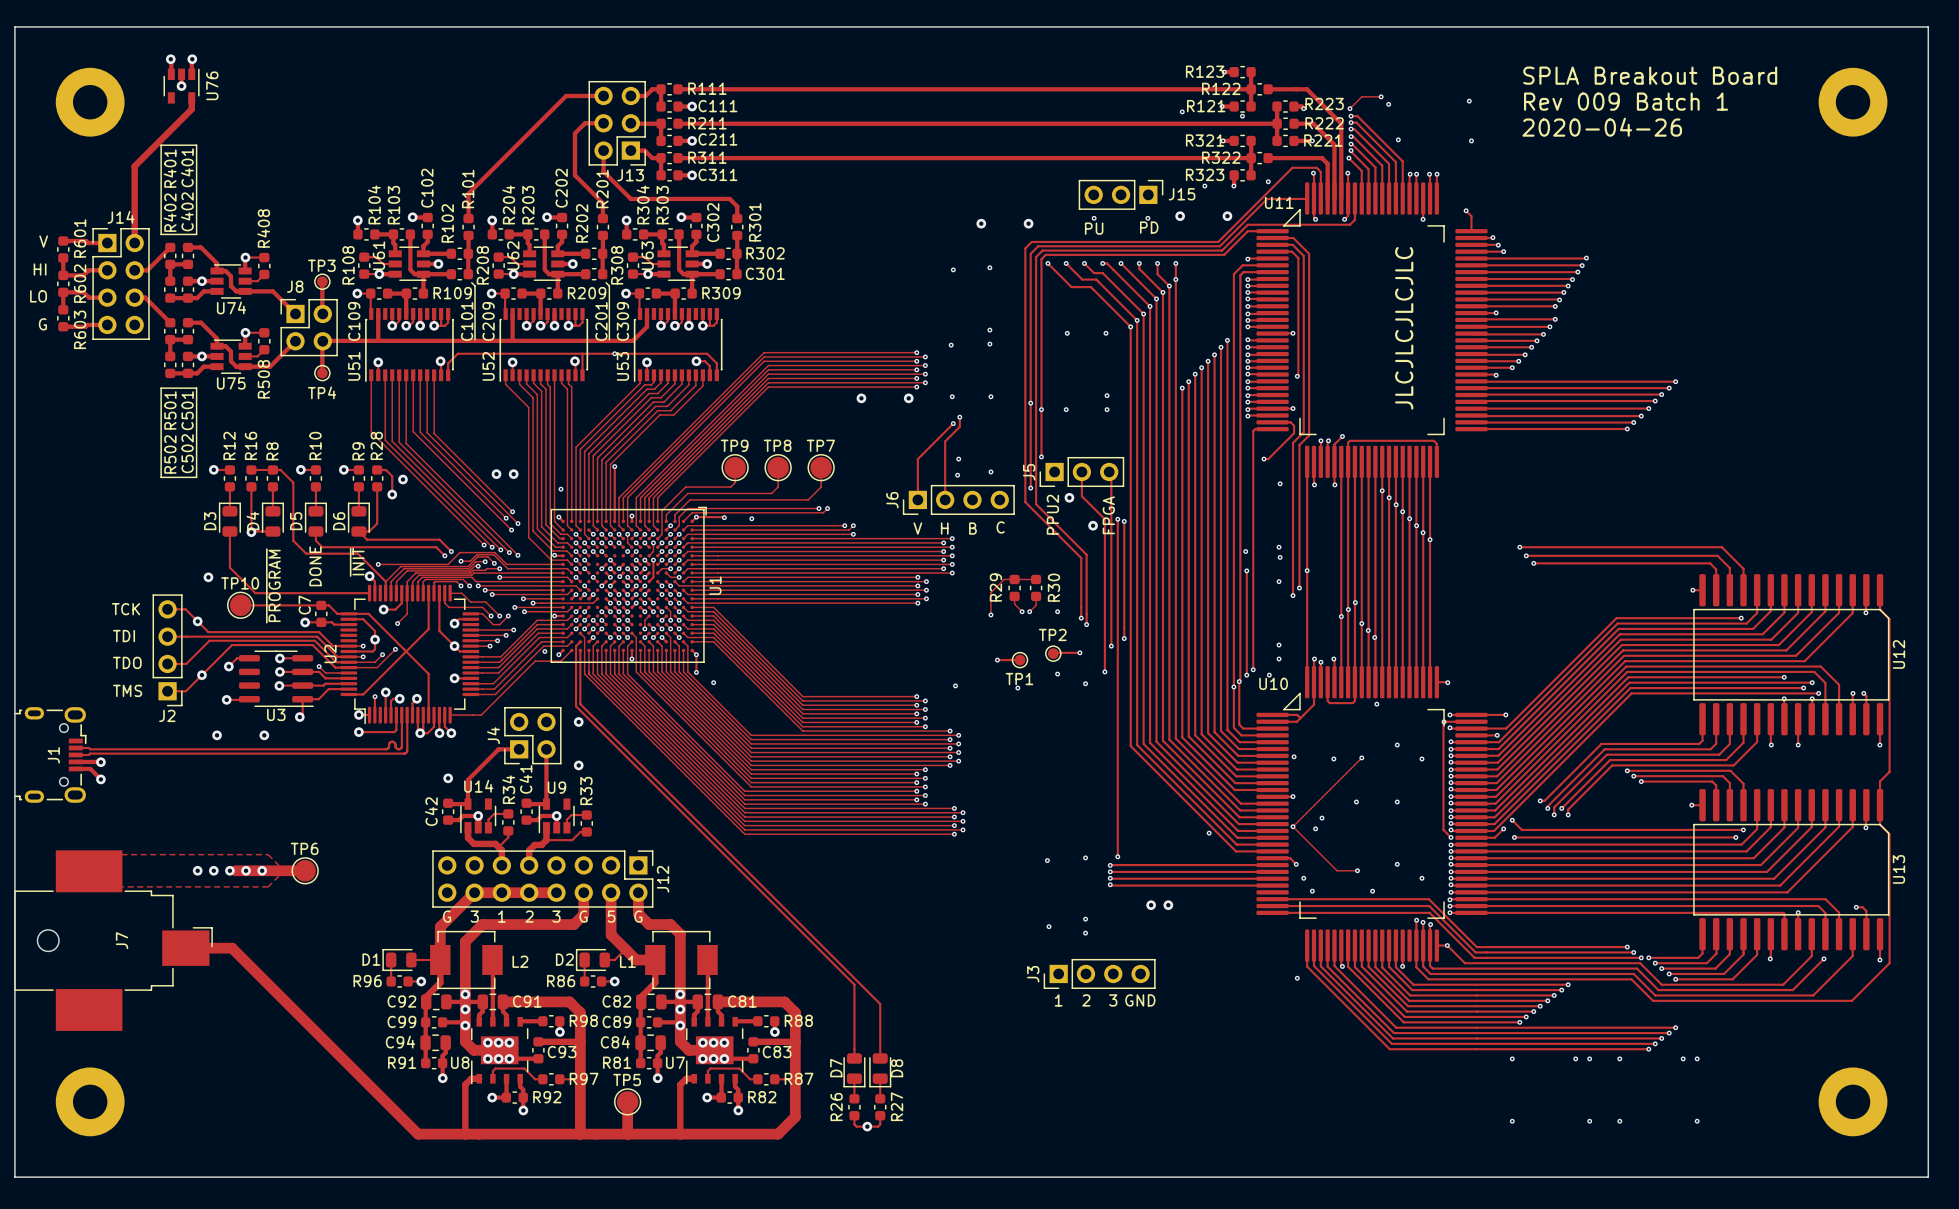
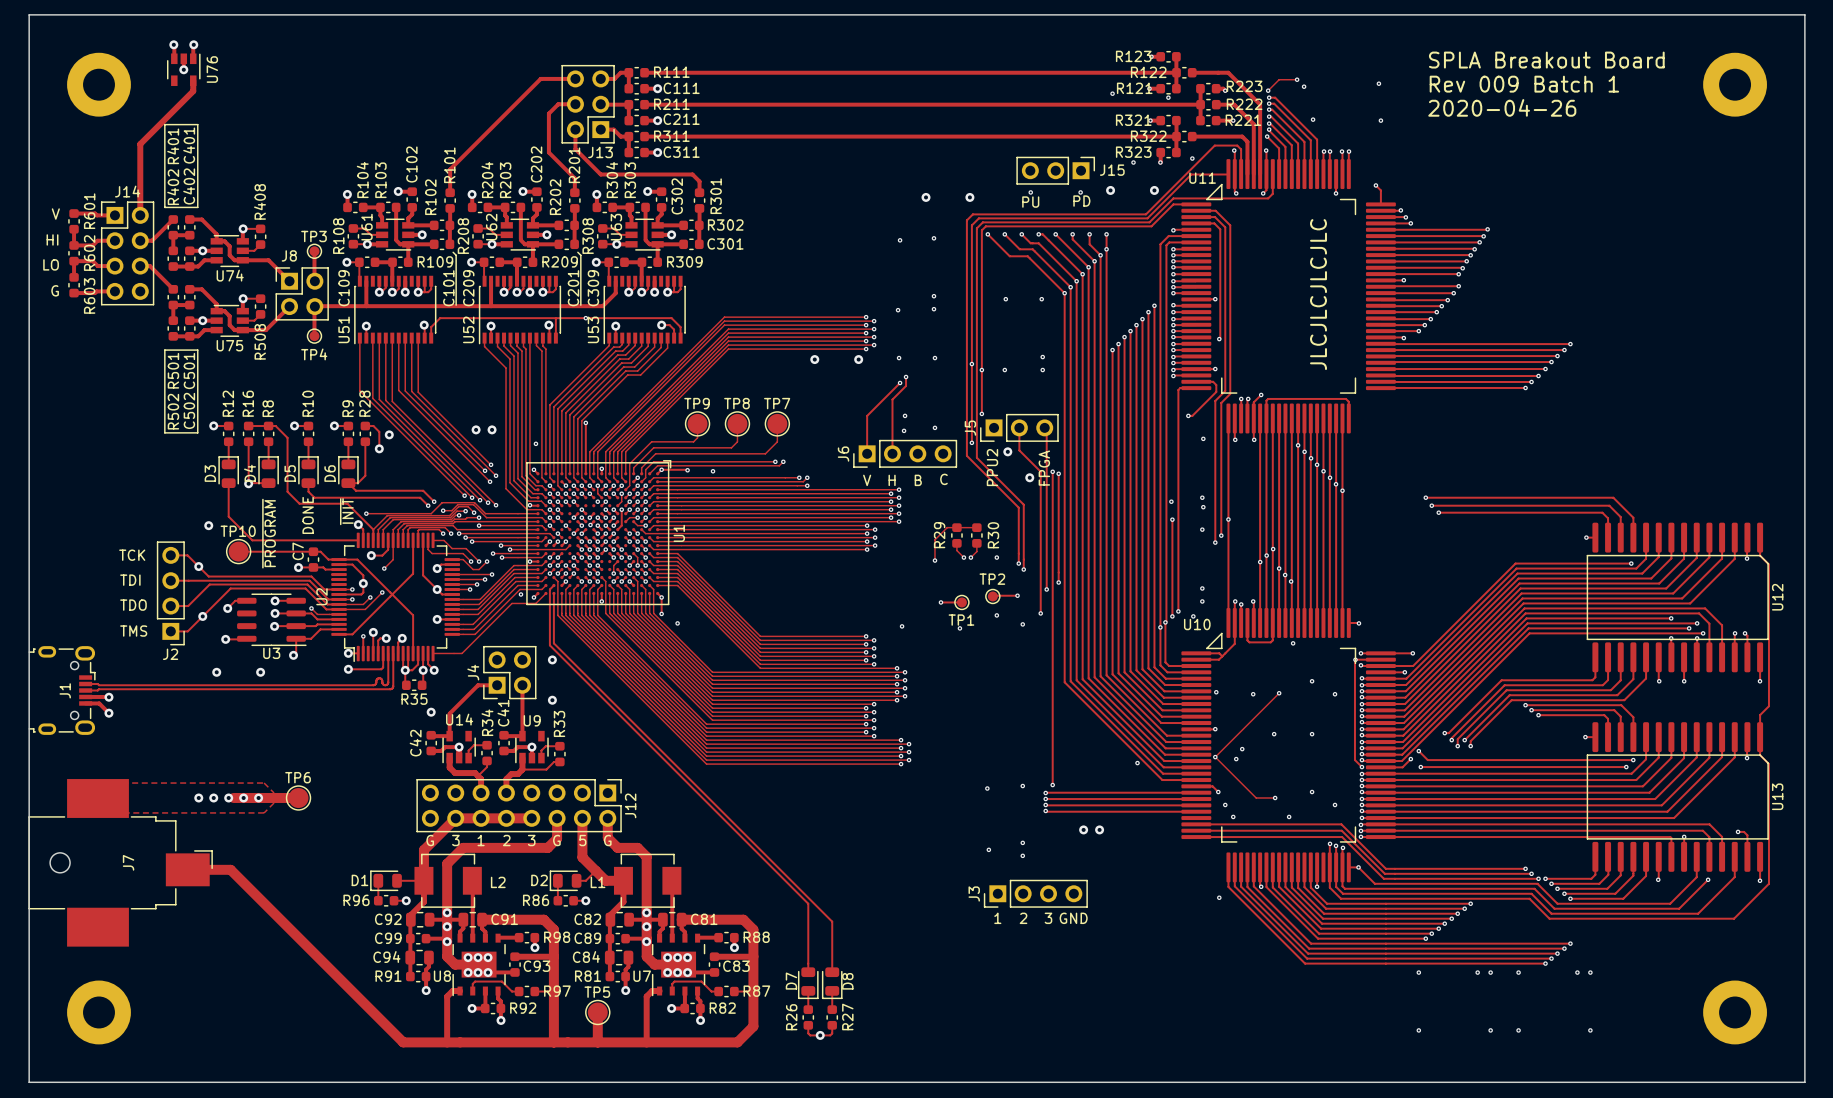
track: none -> (405, 670) (406, 685)
track: none -> (423, 670) (422, 685)
R35: none -> (414, 685)

